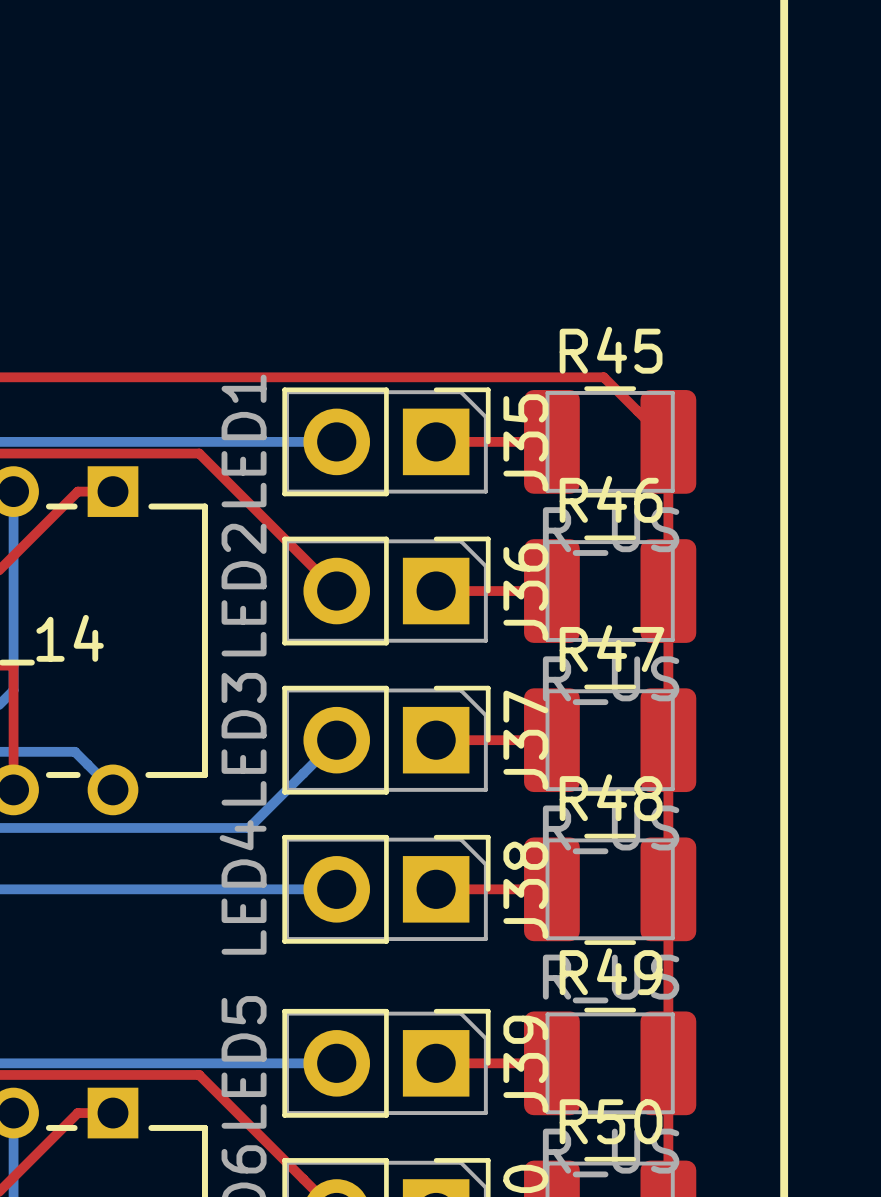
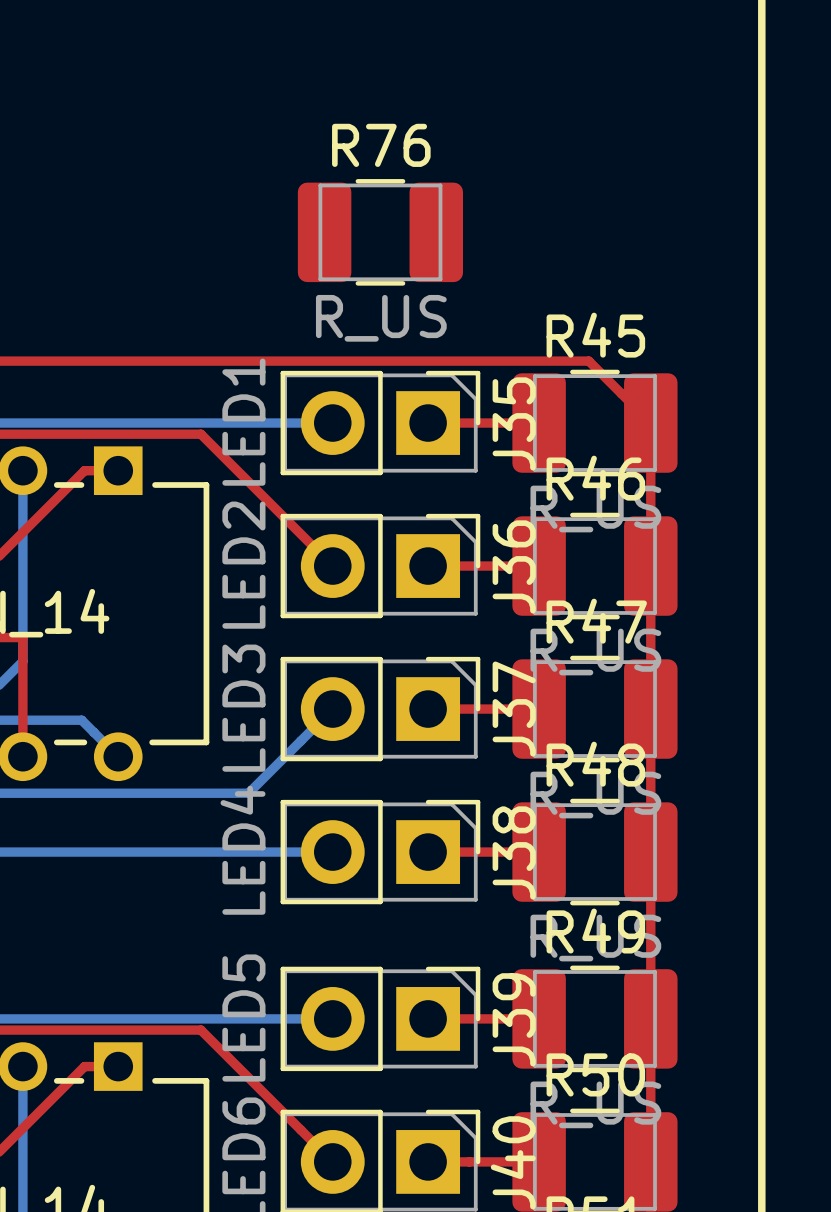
R76: none -> R_US (380, 232)

